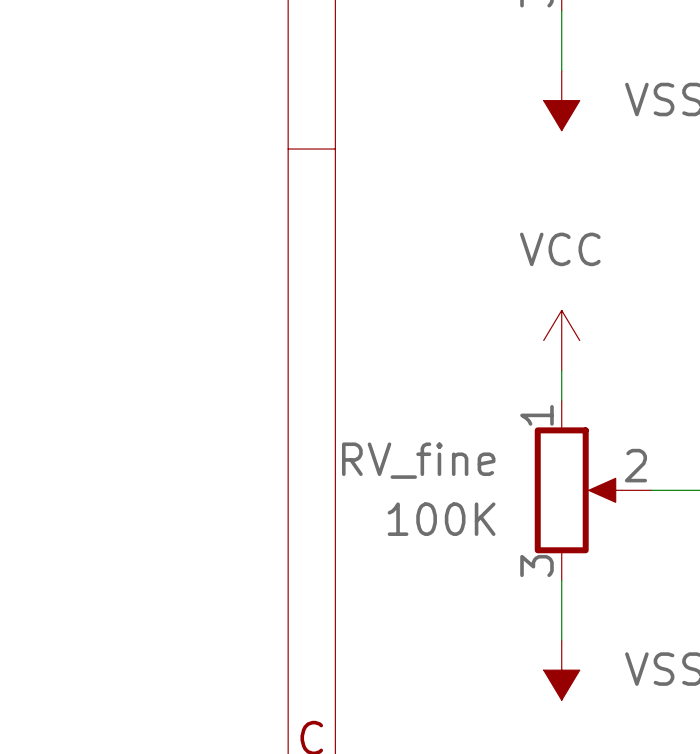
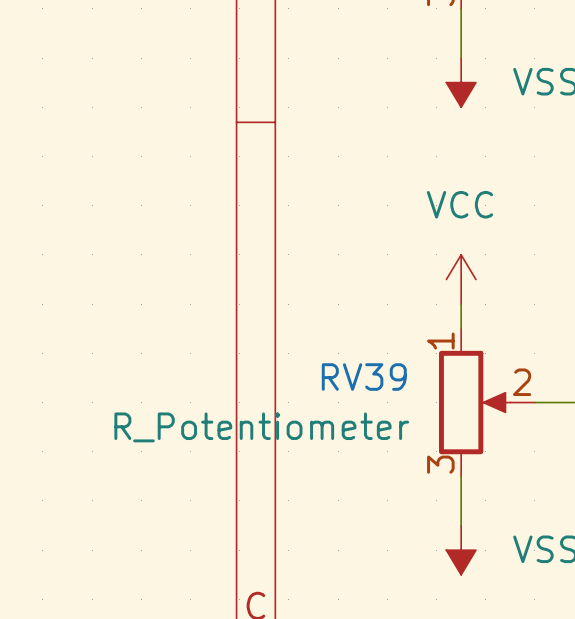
RV_fine name: RV_fine (418, 460) -> RV39 (364, 377)
RV_fine value: 100K (441, 519) -> R_Potentiometer (261, 427)

